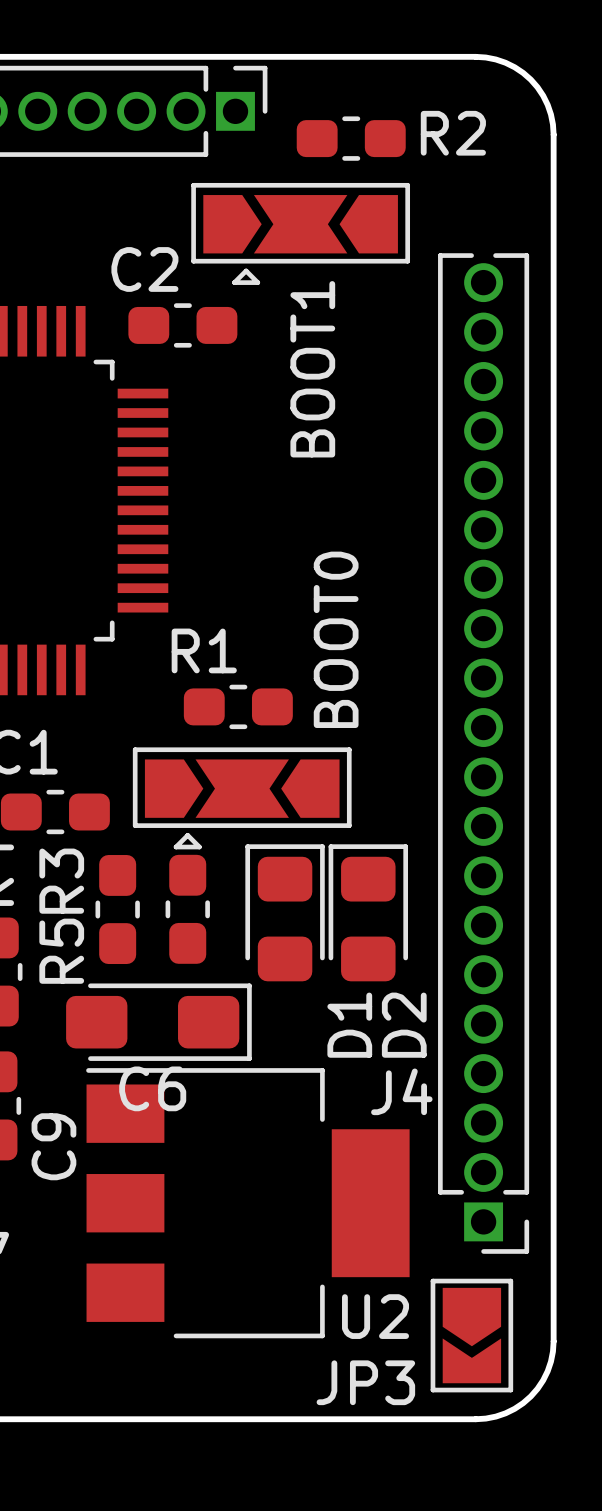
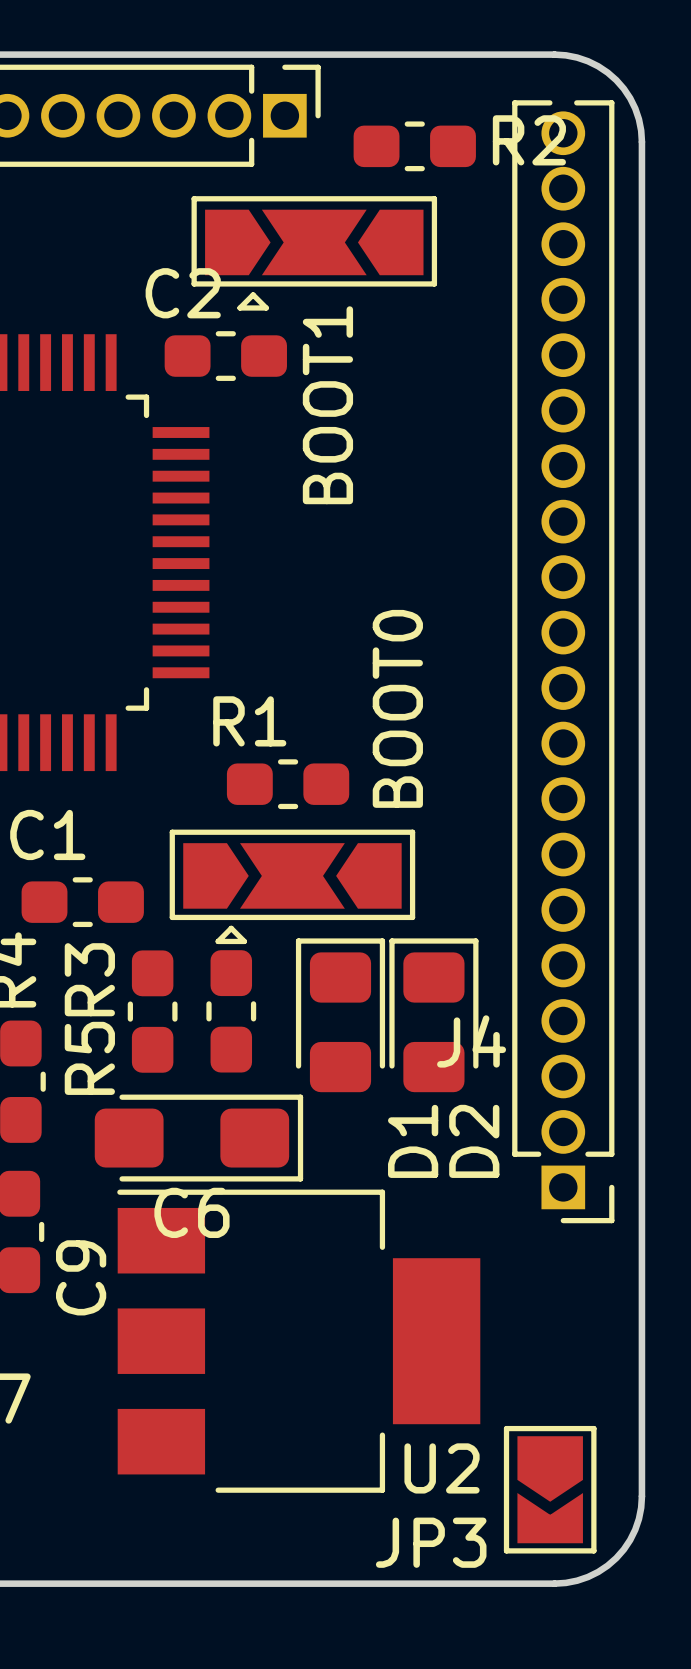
BOOT1 position: (300, 233) -> (314, 253)
J4 position: (483, 753) -> (563, 661)

